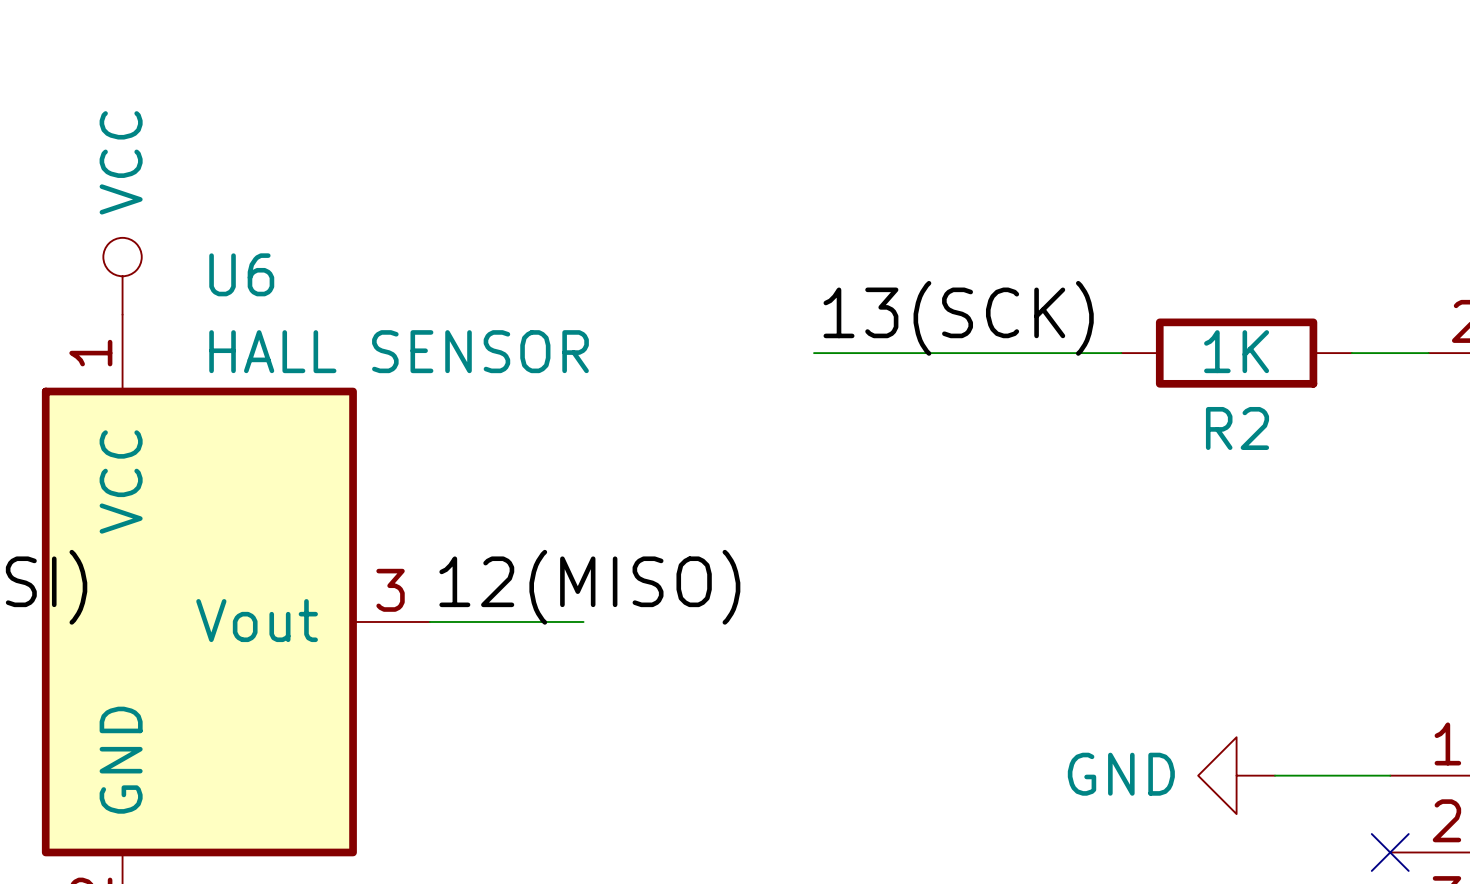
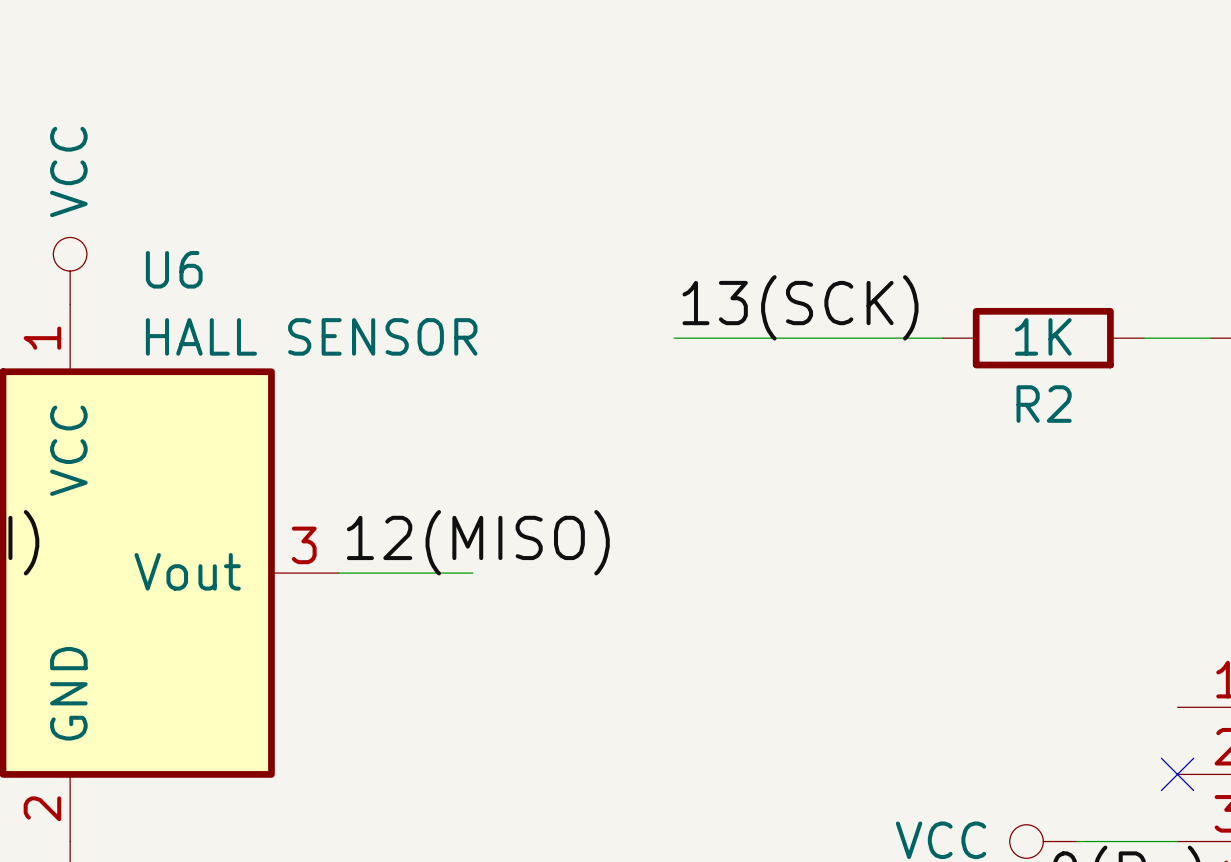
power symbol: GND (1236, 775) -> none
wire: (1275, 775) (1390, 775) -> none

